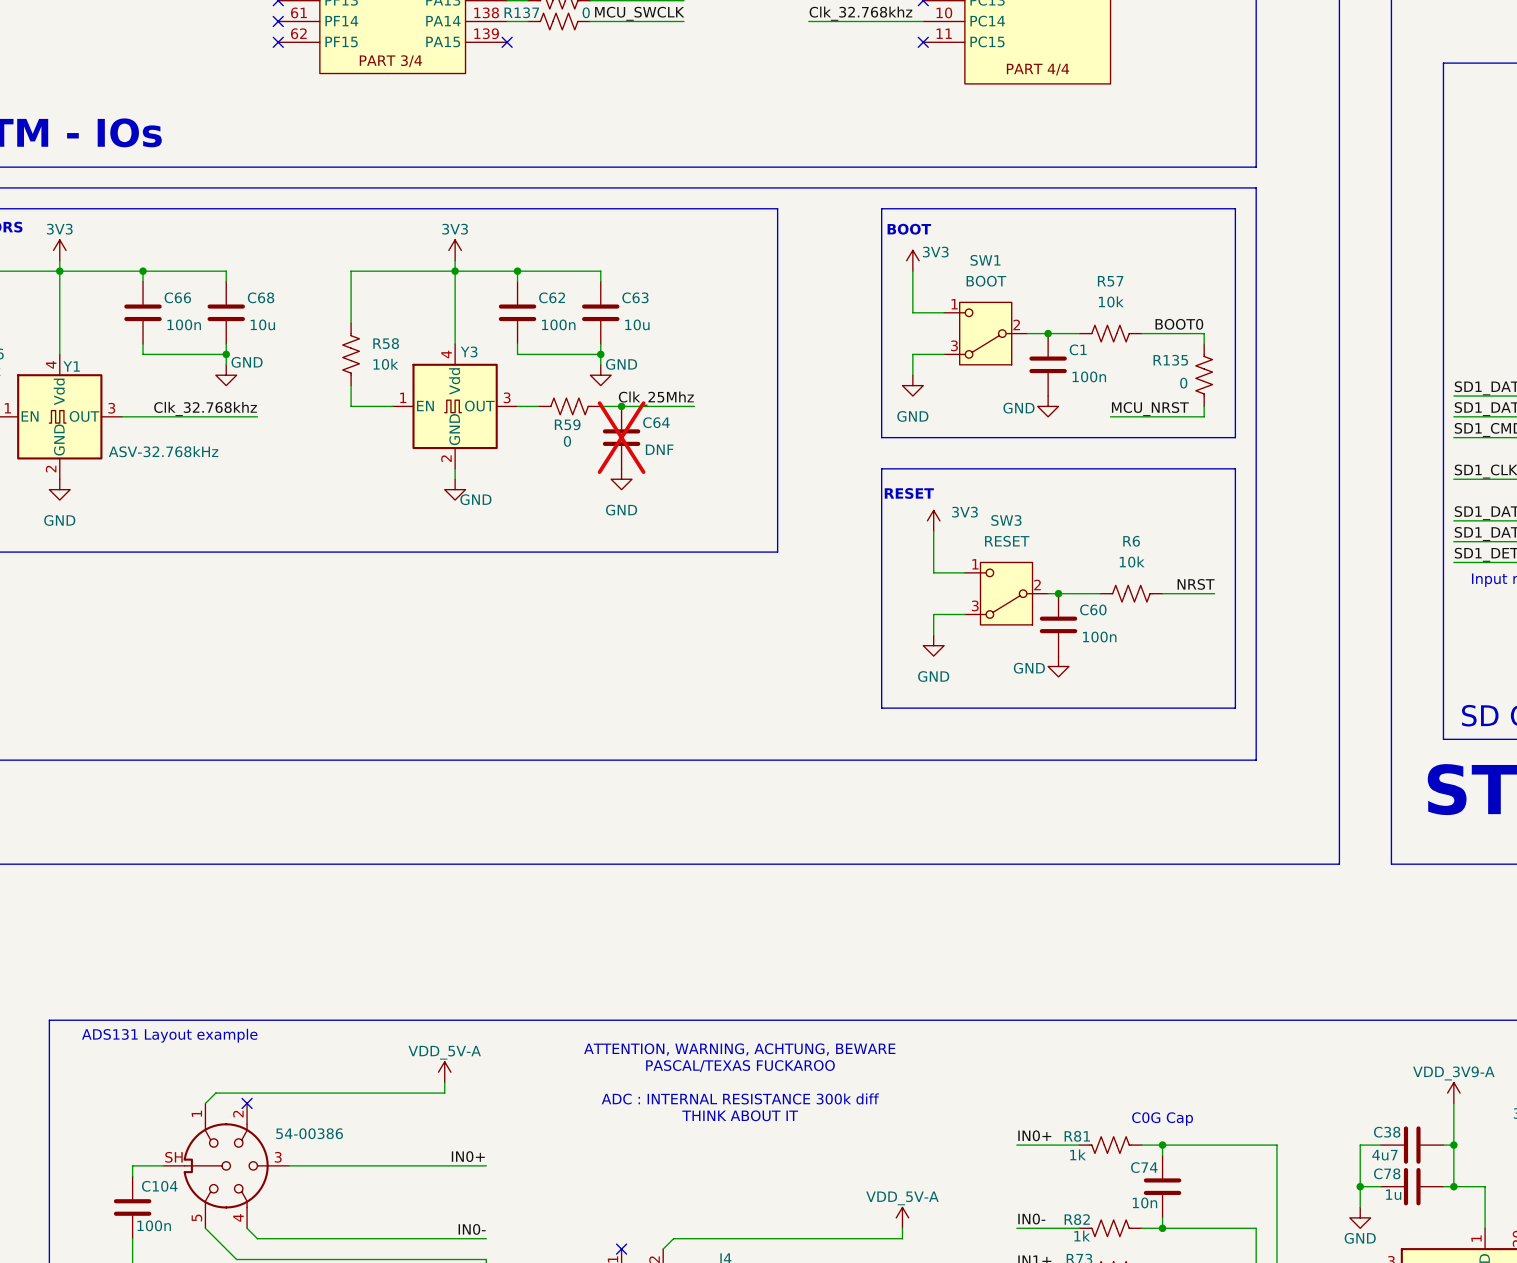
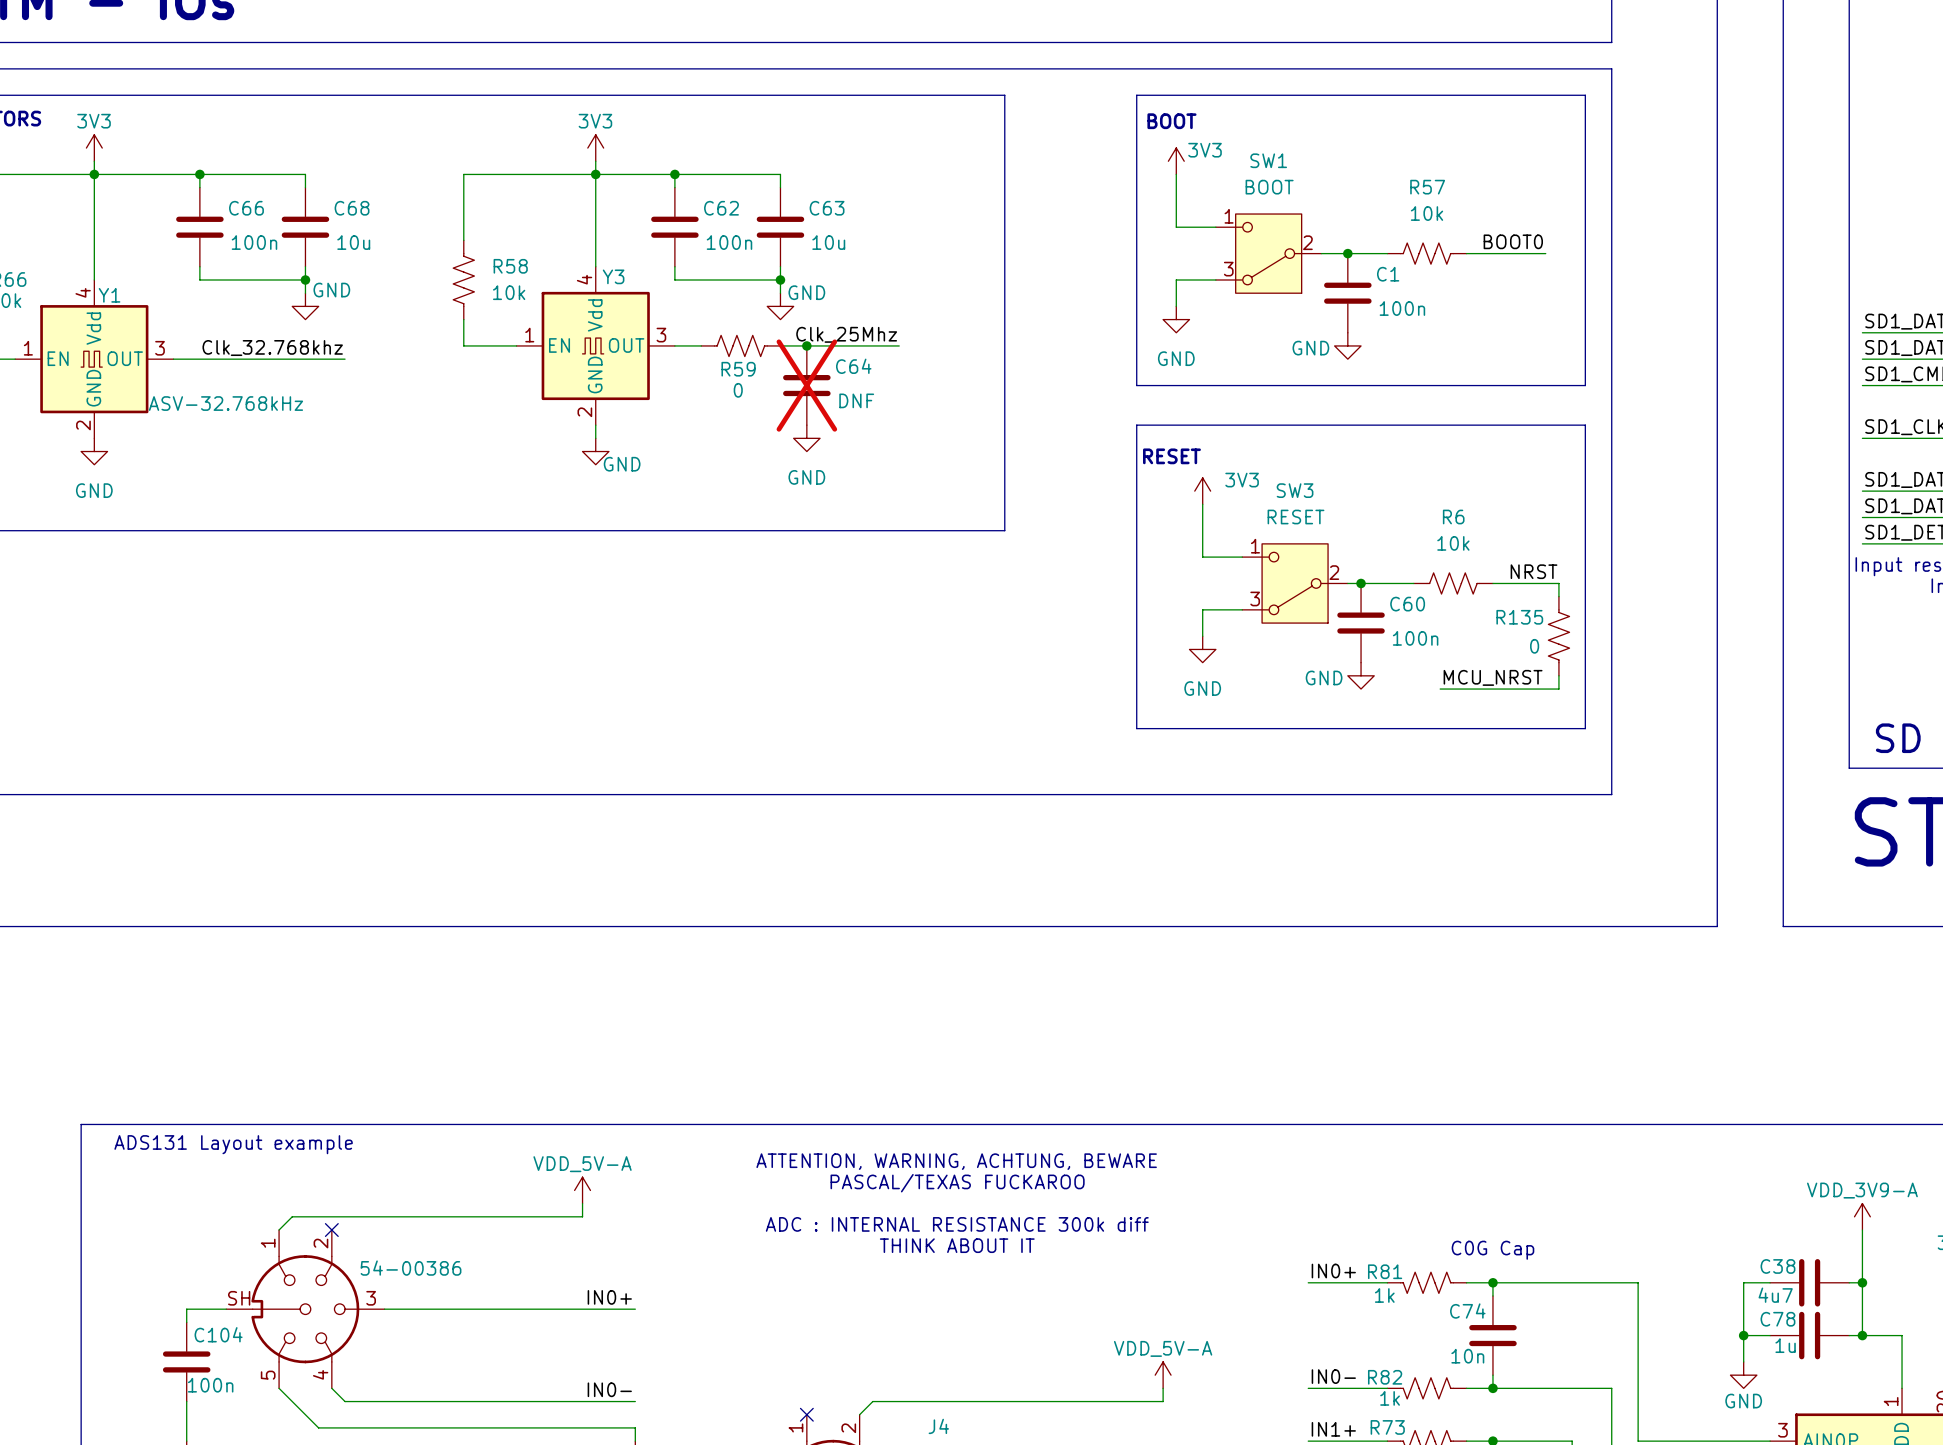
wire: (1204, 333) (1204, 344) -> none
R135 position: (1204, 375) -> (1558, 636)
wire: (1204, 406) (1204, 416) (1110, 416) -> none
label: MCU_NRST (1150, 409) -> none
wire: none -> (1558, 583) (1558, 596)
wire: none -> (1558, 675) (1558, 689) (1440, 689)
label: none -> MCU_NRST (1493, 677)

